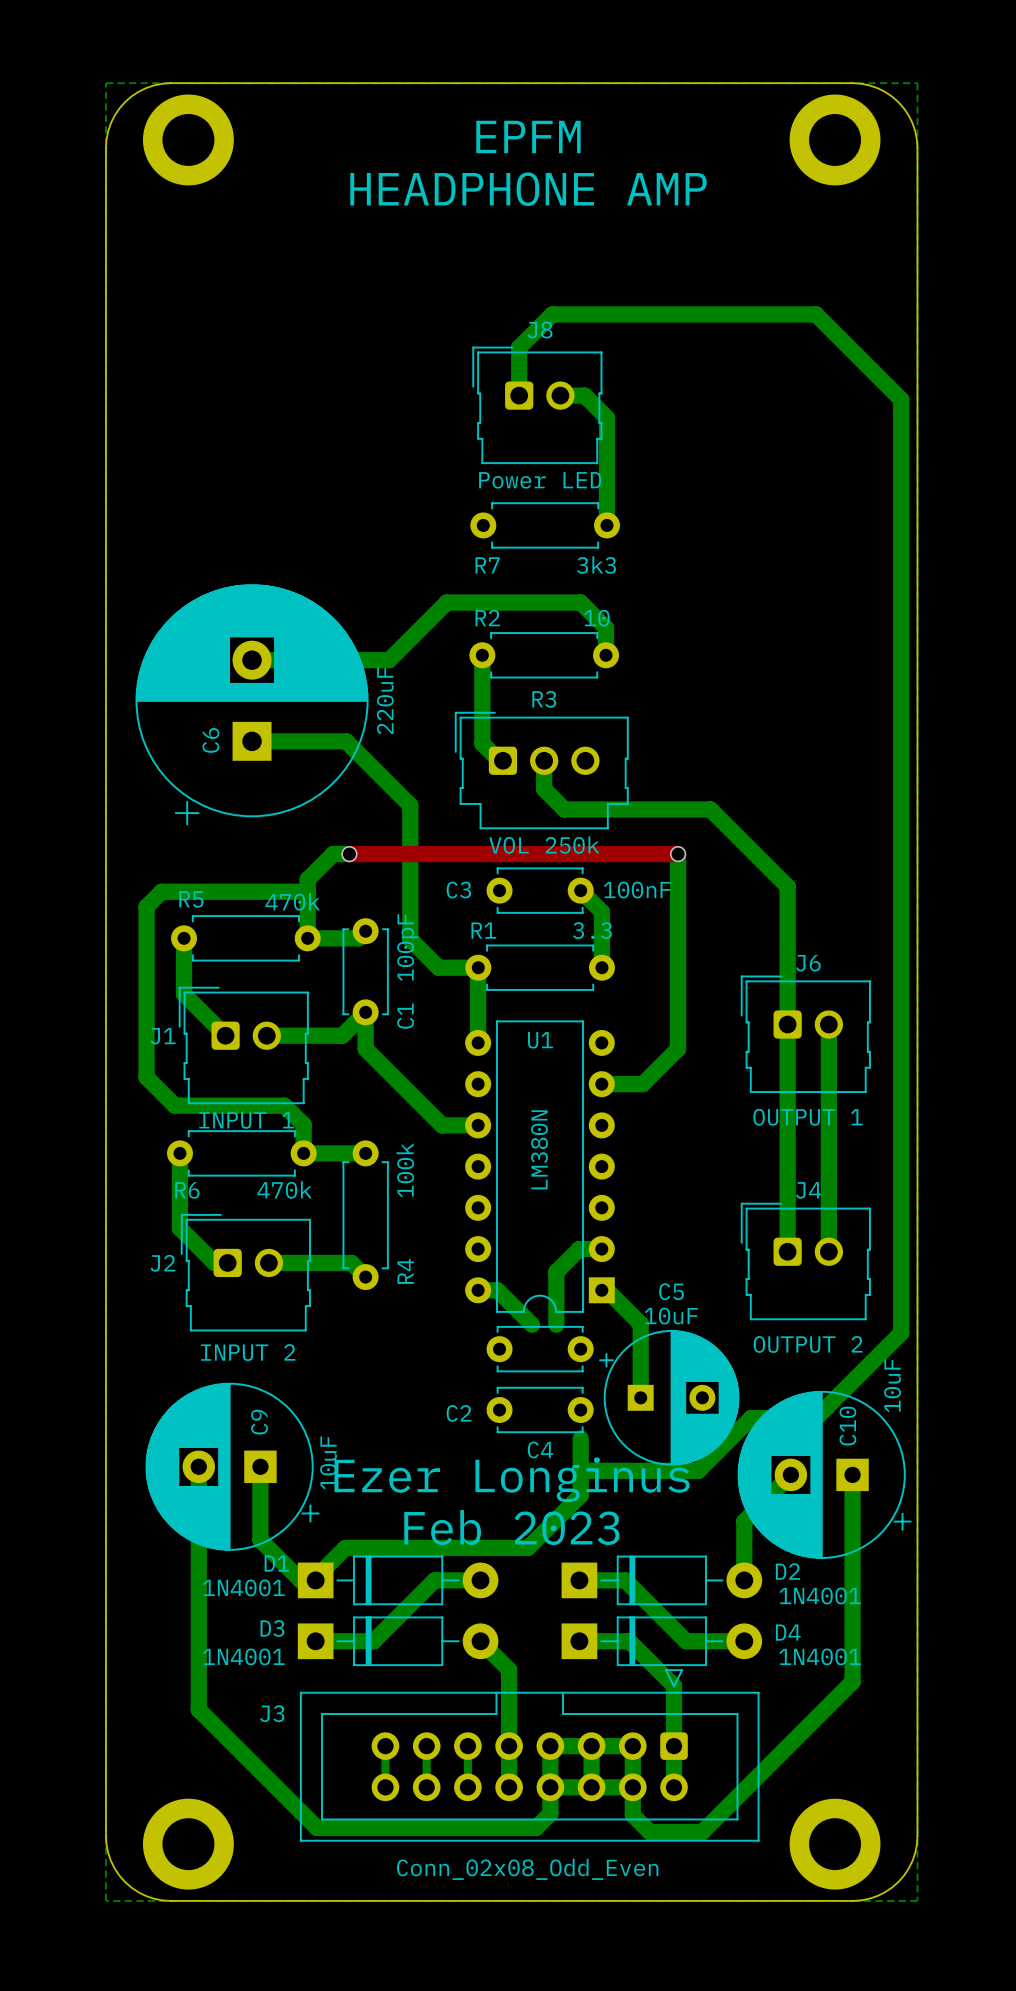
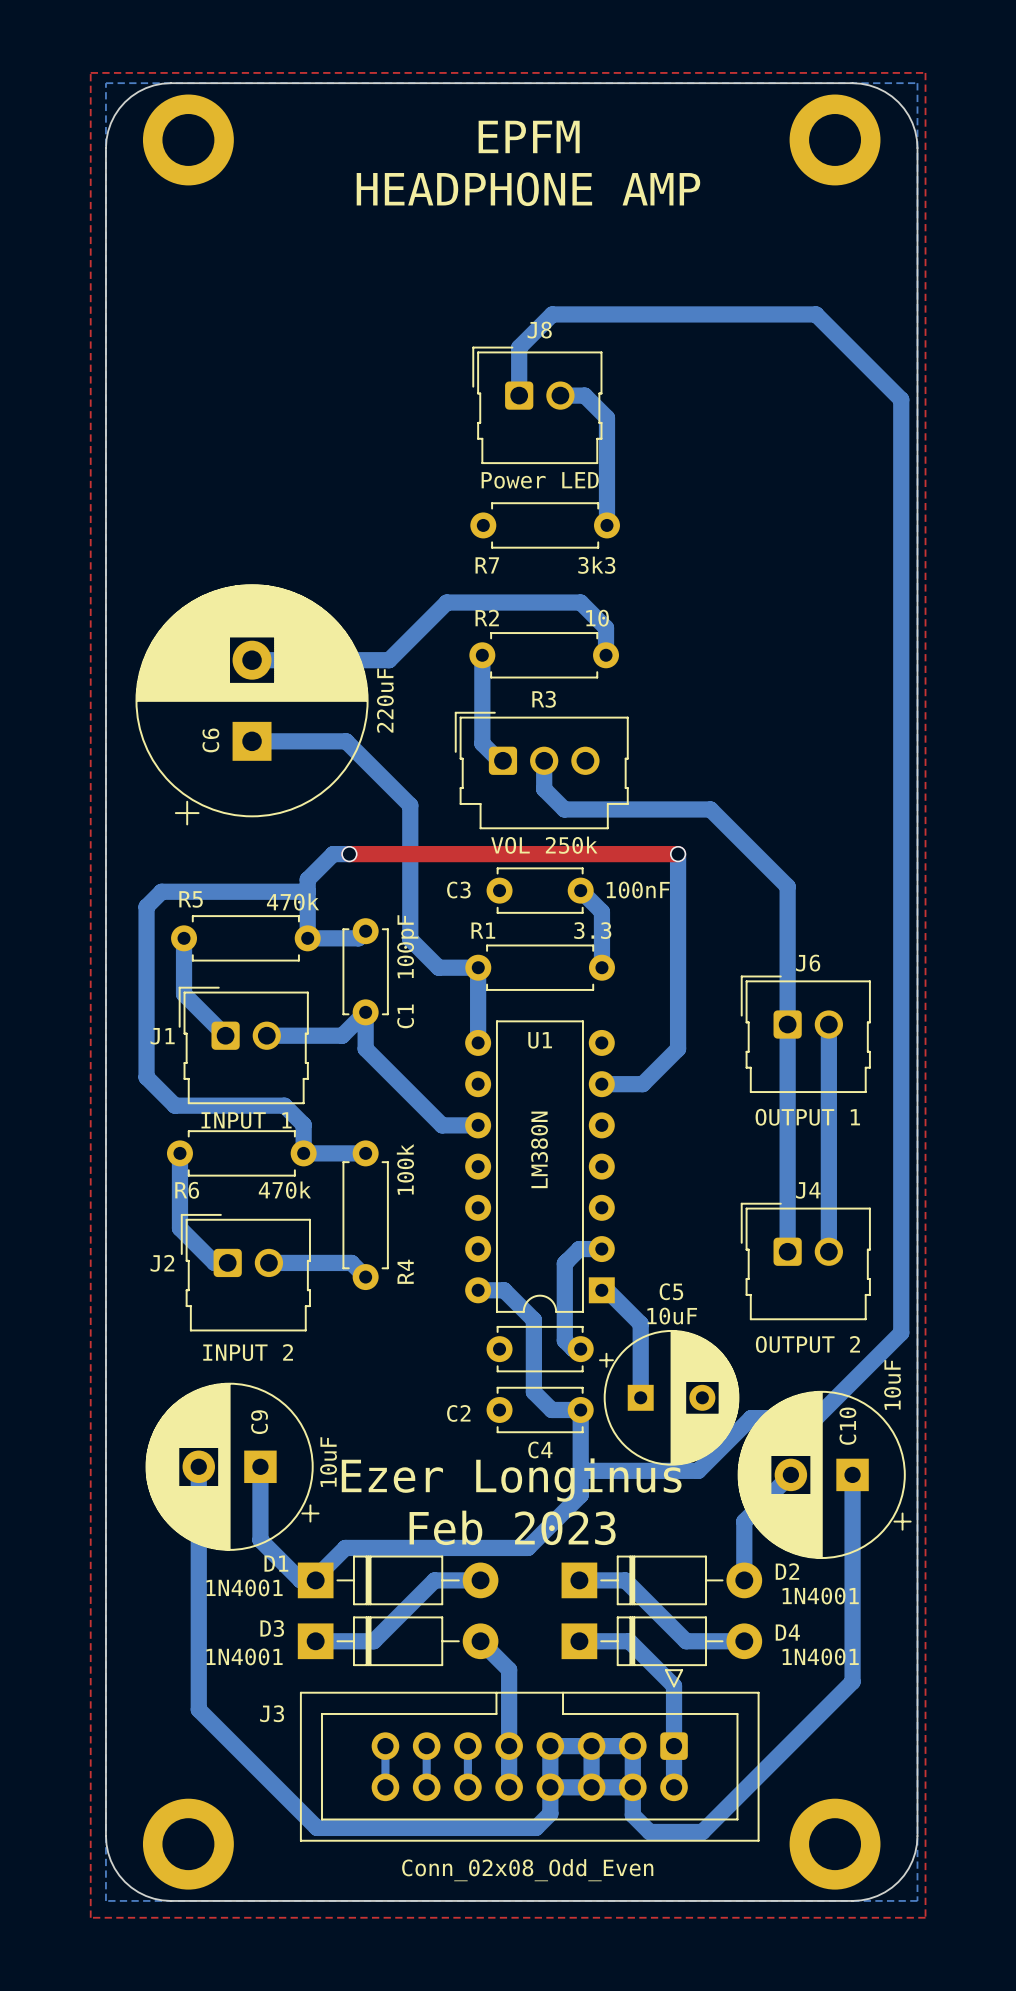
top zone outline: none -> (90, 72) (90, 1917) (925, 1917) (925, 72) (90, 72)
bottom track: (564, 1263) (556, 1272) (556, 1324) -> (564, 1263) (564, 1340) (573, 1349) (580, 1349)
bottom track: (497, 1290) (532, 1324) -> (497, 1290) (504, 1290) (533, 1319) (533, 1392) (551, 1409) (580, 1409) (580, 1438)

